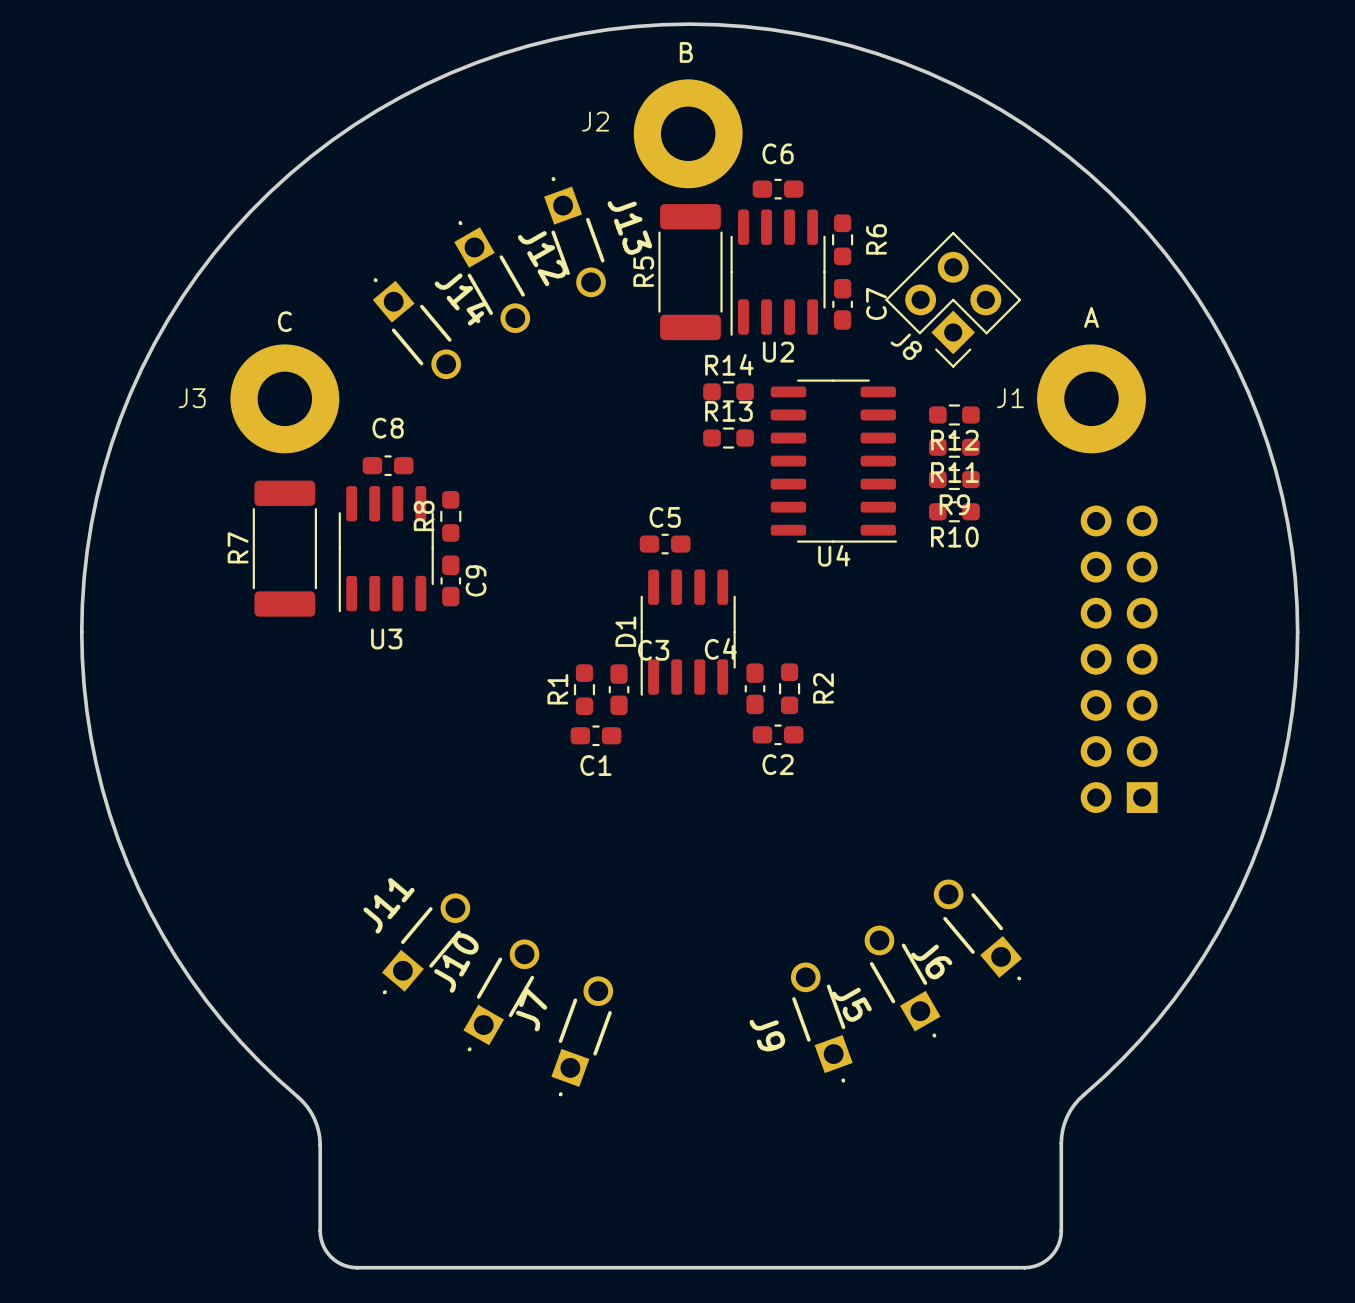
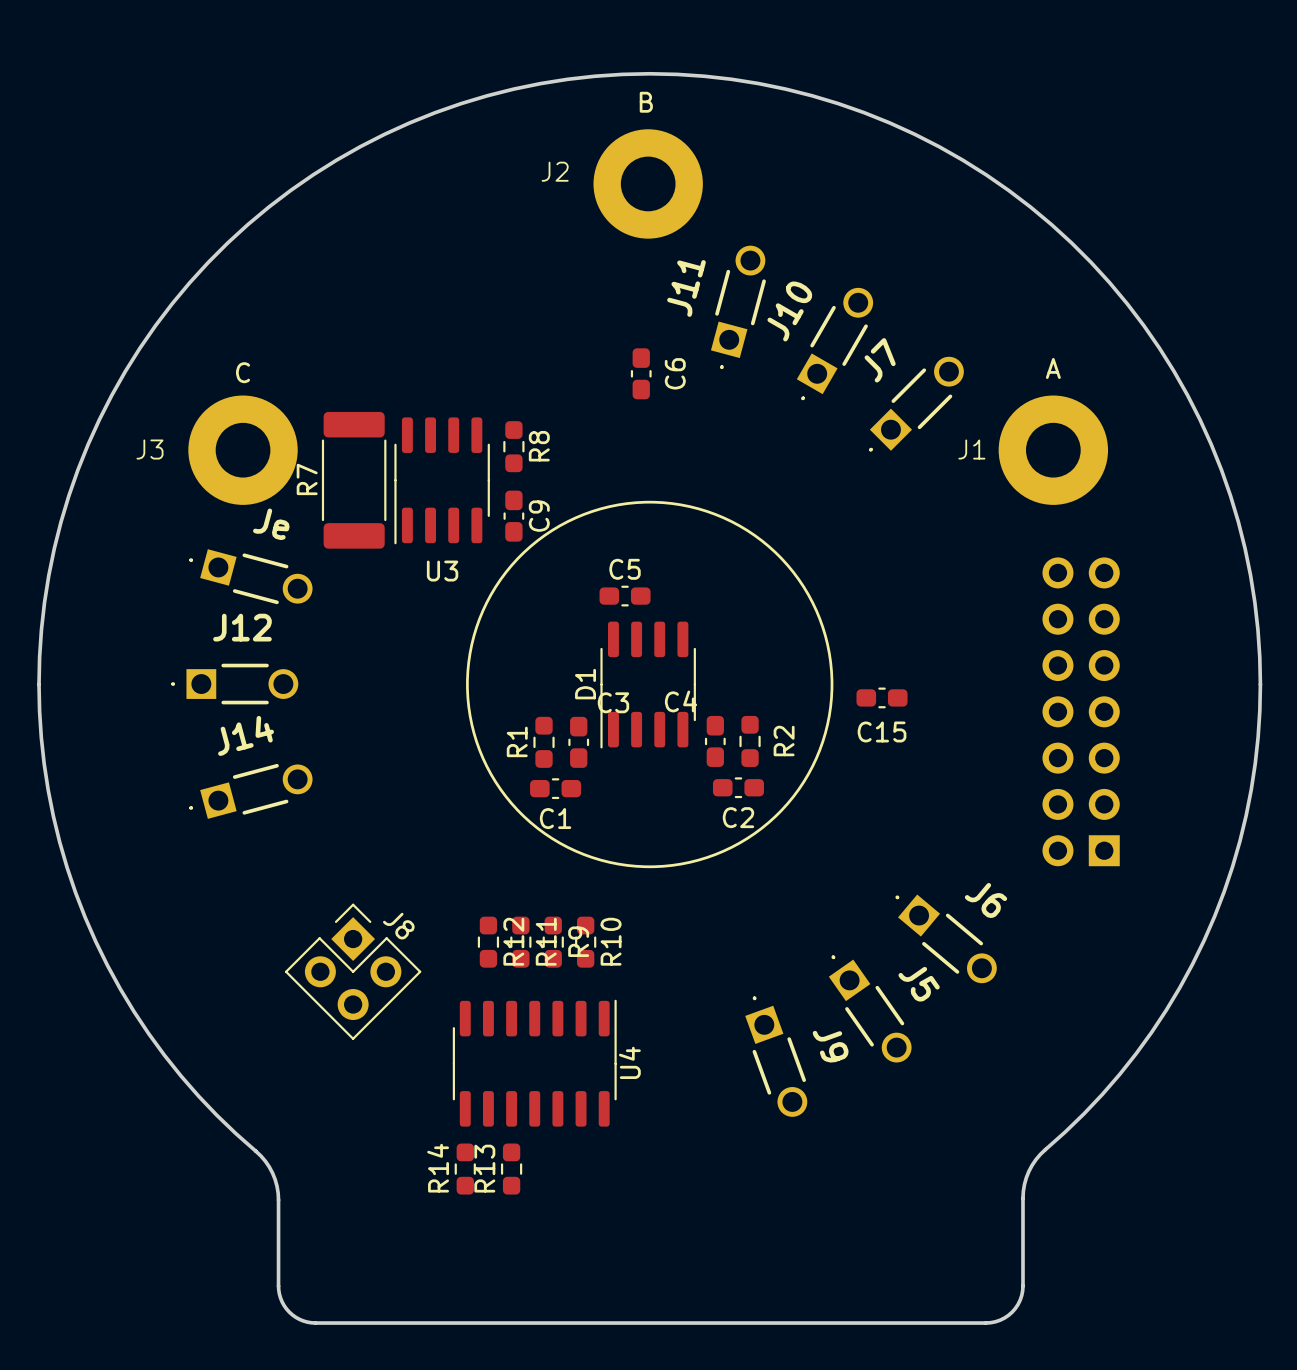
C6 rotation: 0° (778, 189) -> 90° clockwise (641, 373)
C6 position: (778, 189) -> (641, 373)
J13: (574, 237) -> none
R6: (842, 239) -> none
R5: (690, 272) -> none
U2: (778, 272) -> none
J12 rotation: 0° (492, 277) -> 60° counterclockwise (234, 684)
J12 position: (492, 277) -> (234, 684)
J8 rotation: 0° (953, 299) -> 180° (353, 971)
J8 position: (953, 299) -> (353, 971)
C7: (842, 304) -> none
J14 rotation: 0° (416, 328) -> 65° counterclockwise (250, 791)
J14 position: (416, 328) -> (250, 791)
R14 name position: R14 (729, 364) -> R14 (438, 1168)
R14 rotation: 0° (728, 391) -> 90° clockwise (465, 1169)
R14 position: (728, 391) -> (465, 1169)
R13 name position: R13 (728, 411) -> R13 (484, 1168)
R12 rotation: 0° (954, 414) -> 90° clockwise (488, 942)
R12 position: (954, 414) -> (488, 942)
R13 rotation: 0° (728, 438) -> 90° clockwise (511, 1169)
R13 position: (728, 438) -> (511, 1169)
R12 name position: R12 (954, 440) -> R12 (513, 941)
R11 rotation: 0° (954, 447) -> 90° clockwise (520, 942)
R11 position: (954, 447) -> (520, 942)
drawing: none -> [466, 500, 834, 869]
U4 rotation: 0° (833, 461) -> 90° counterclockwise (534, 1063)
U4 position: (833, 461) -> (534, 1063)
C8: (388, 465) -> none
R11 name position: R11 (954, 472) -> R11 (546, 941)
R9 rotation: 0° (954, 479) -> 90° clockwise (553, 942)
R9 position: (954, 479) -> (553, 942)
R9 name position: R9 (954, 504) -> R9 (578, 941)
R10 rotation: 0° (954, 511) -> 90° clockwise (585, 942)
R10 position: (954, 511) -> (585, 942)
R8 name position: R8 (424, 515) -> R8 (539, 446)
R8 position: (450, 516) -> (513, 446)
Je: none -> (250, 576)
R10 name position: R10 (954, 537) -> R10 (611, 941)
R7 position: (284, 548) -> (354, 480)
U3 position: (386, 549) -> (442, 480)
C9 position: (450, 580) -> (513, 516)
C15: none -> (882, 697)
J5 footprint: [864, 925, 941, 1038] -> [828, 955, 912, 1063]
J6 rotation: 0° (977, 929) -> 170° clockwise (946, 938)
J11 rotation: 0° (426, 943) -> 25° counterclockwise (738, 307)
J11 position: (426, 943) -> (738, 307)
J10 position: (501, 995) -> (834, 343)
J5 name position: J5 (851, 1004) -> J5 (919, 984)
J9 rotation: 0° (821, 1022) -> 180° (776, 1056)
J7 rotation: 0° (582, 1036) -> 25° clockwise (916, 404)
J7 position: (582, 1036) -> (916, 404)

